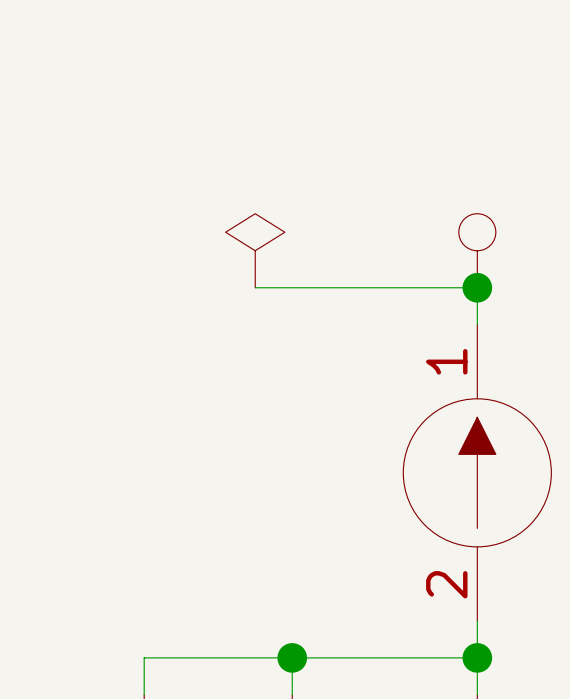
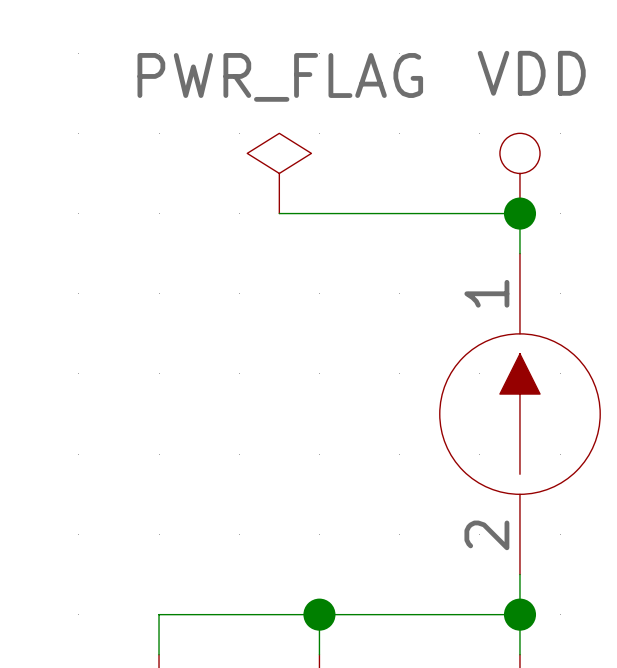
power symbol text: none -> VDD (531, 73)
power symbol text: none -> PWR_FLAG (280, 77)

